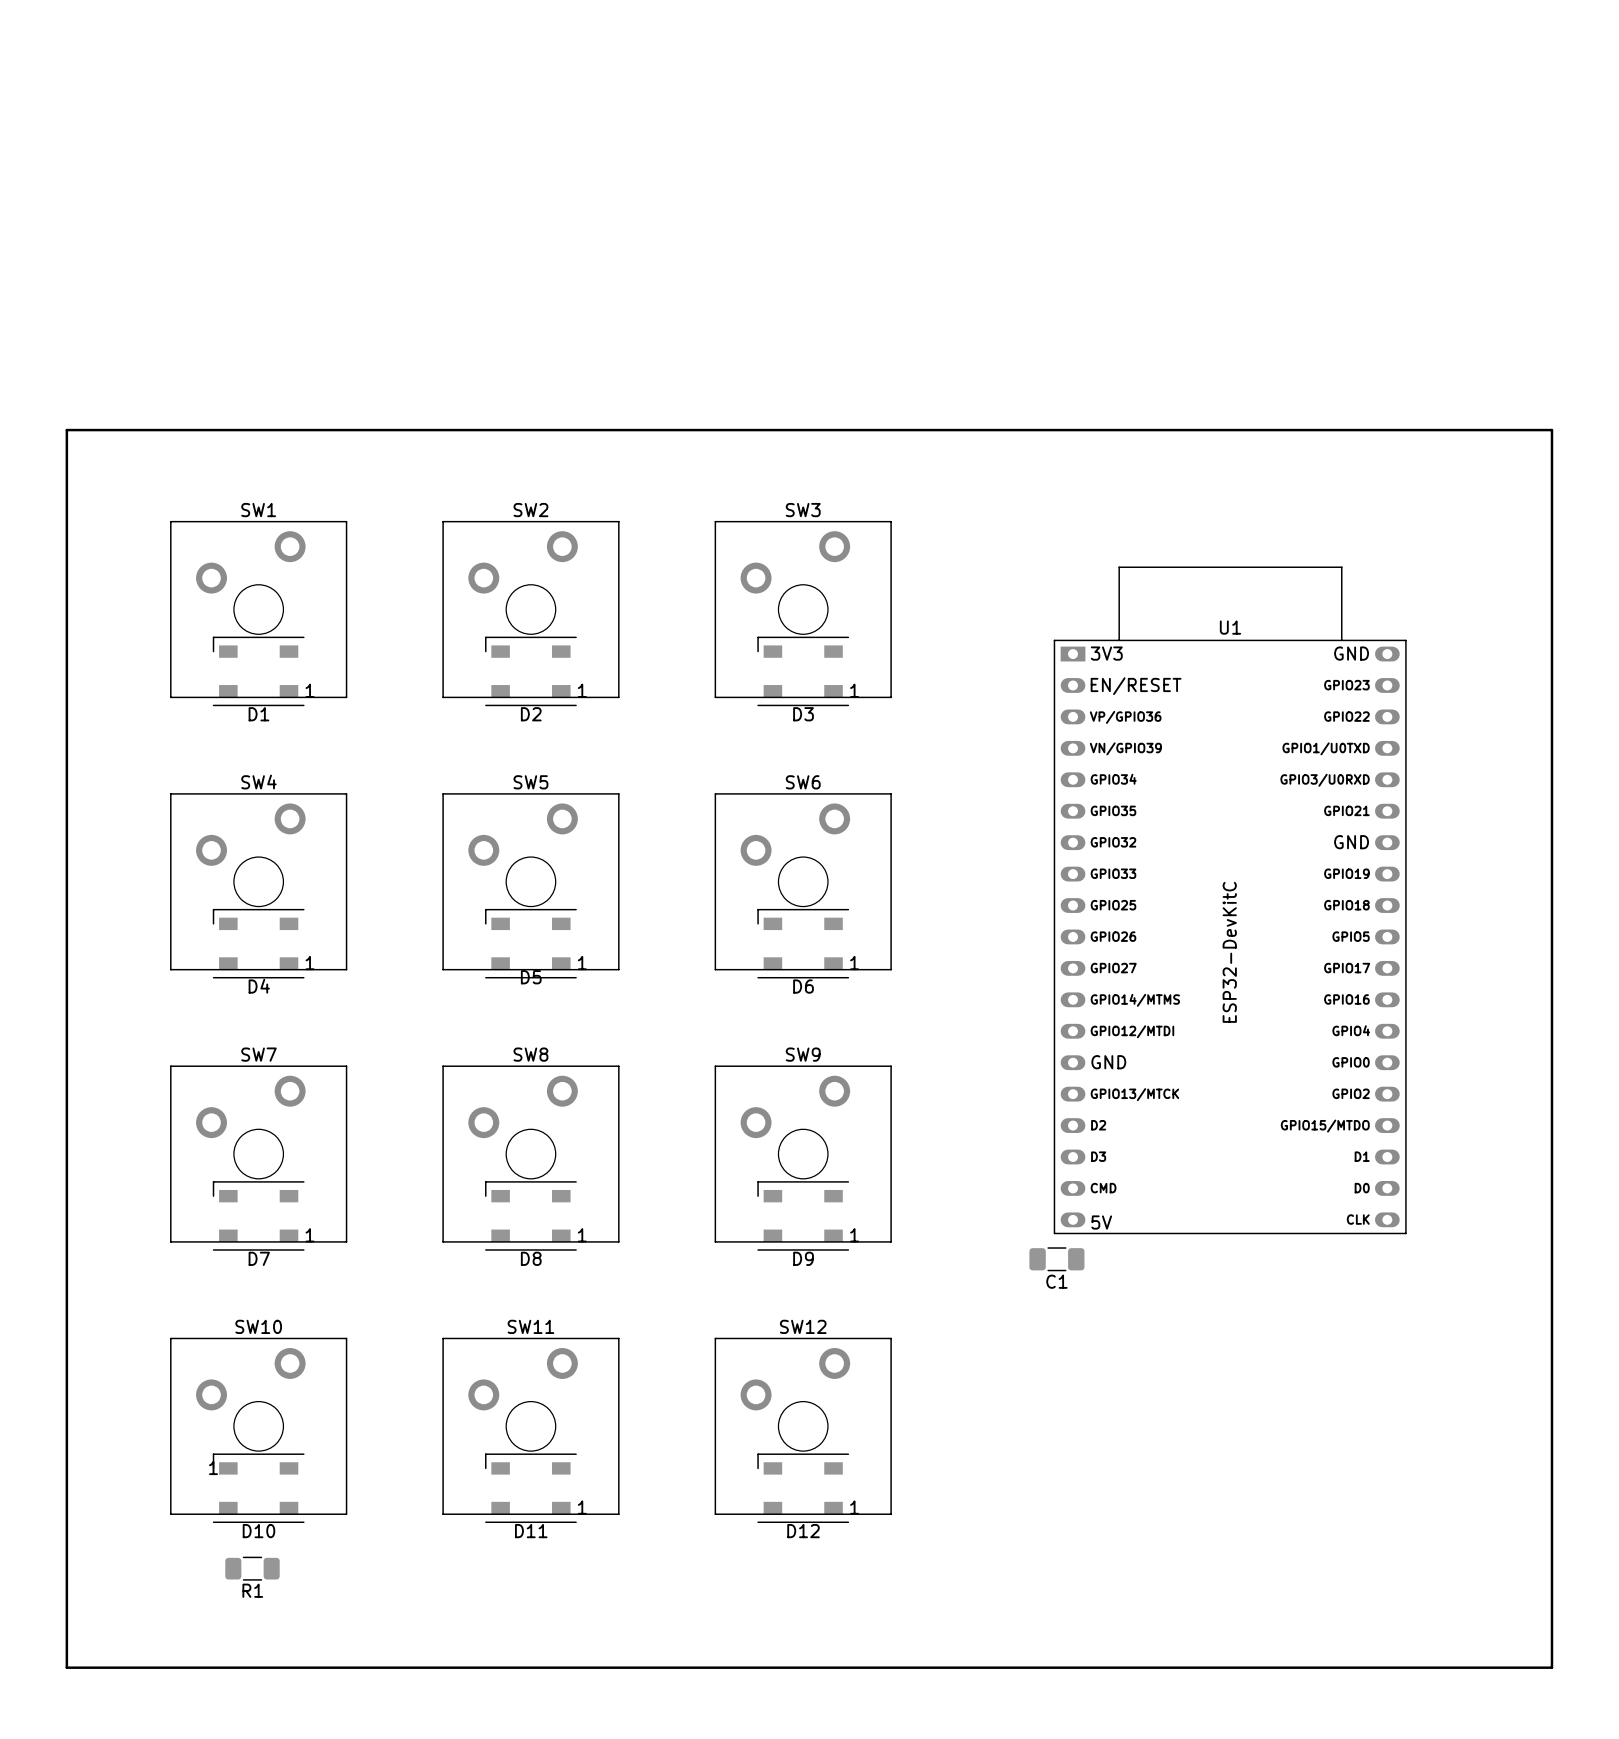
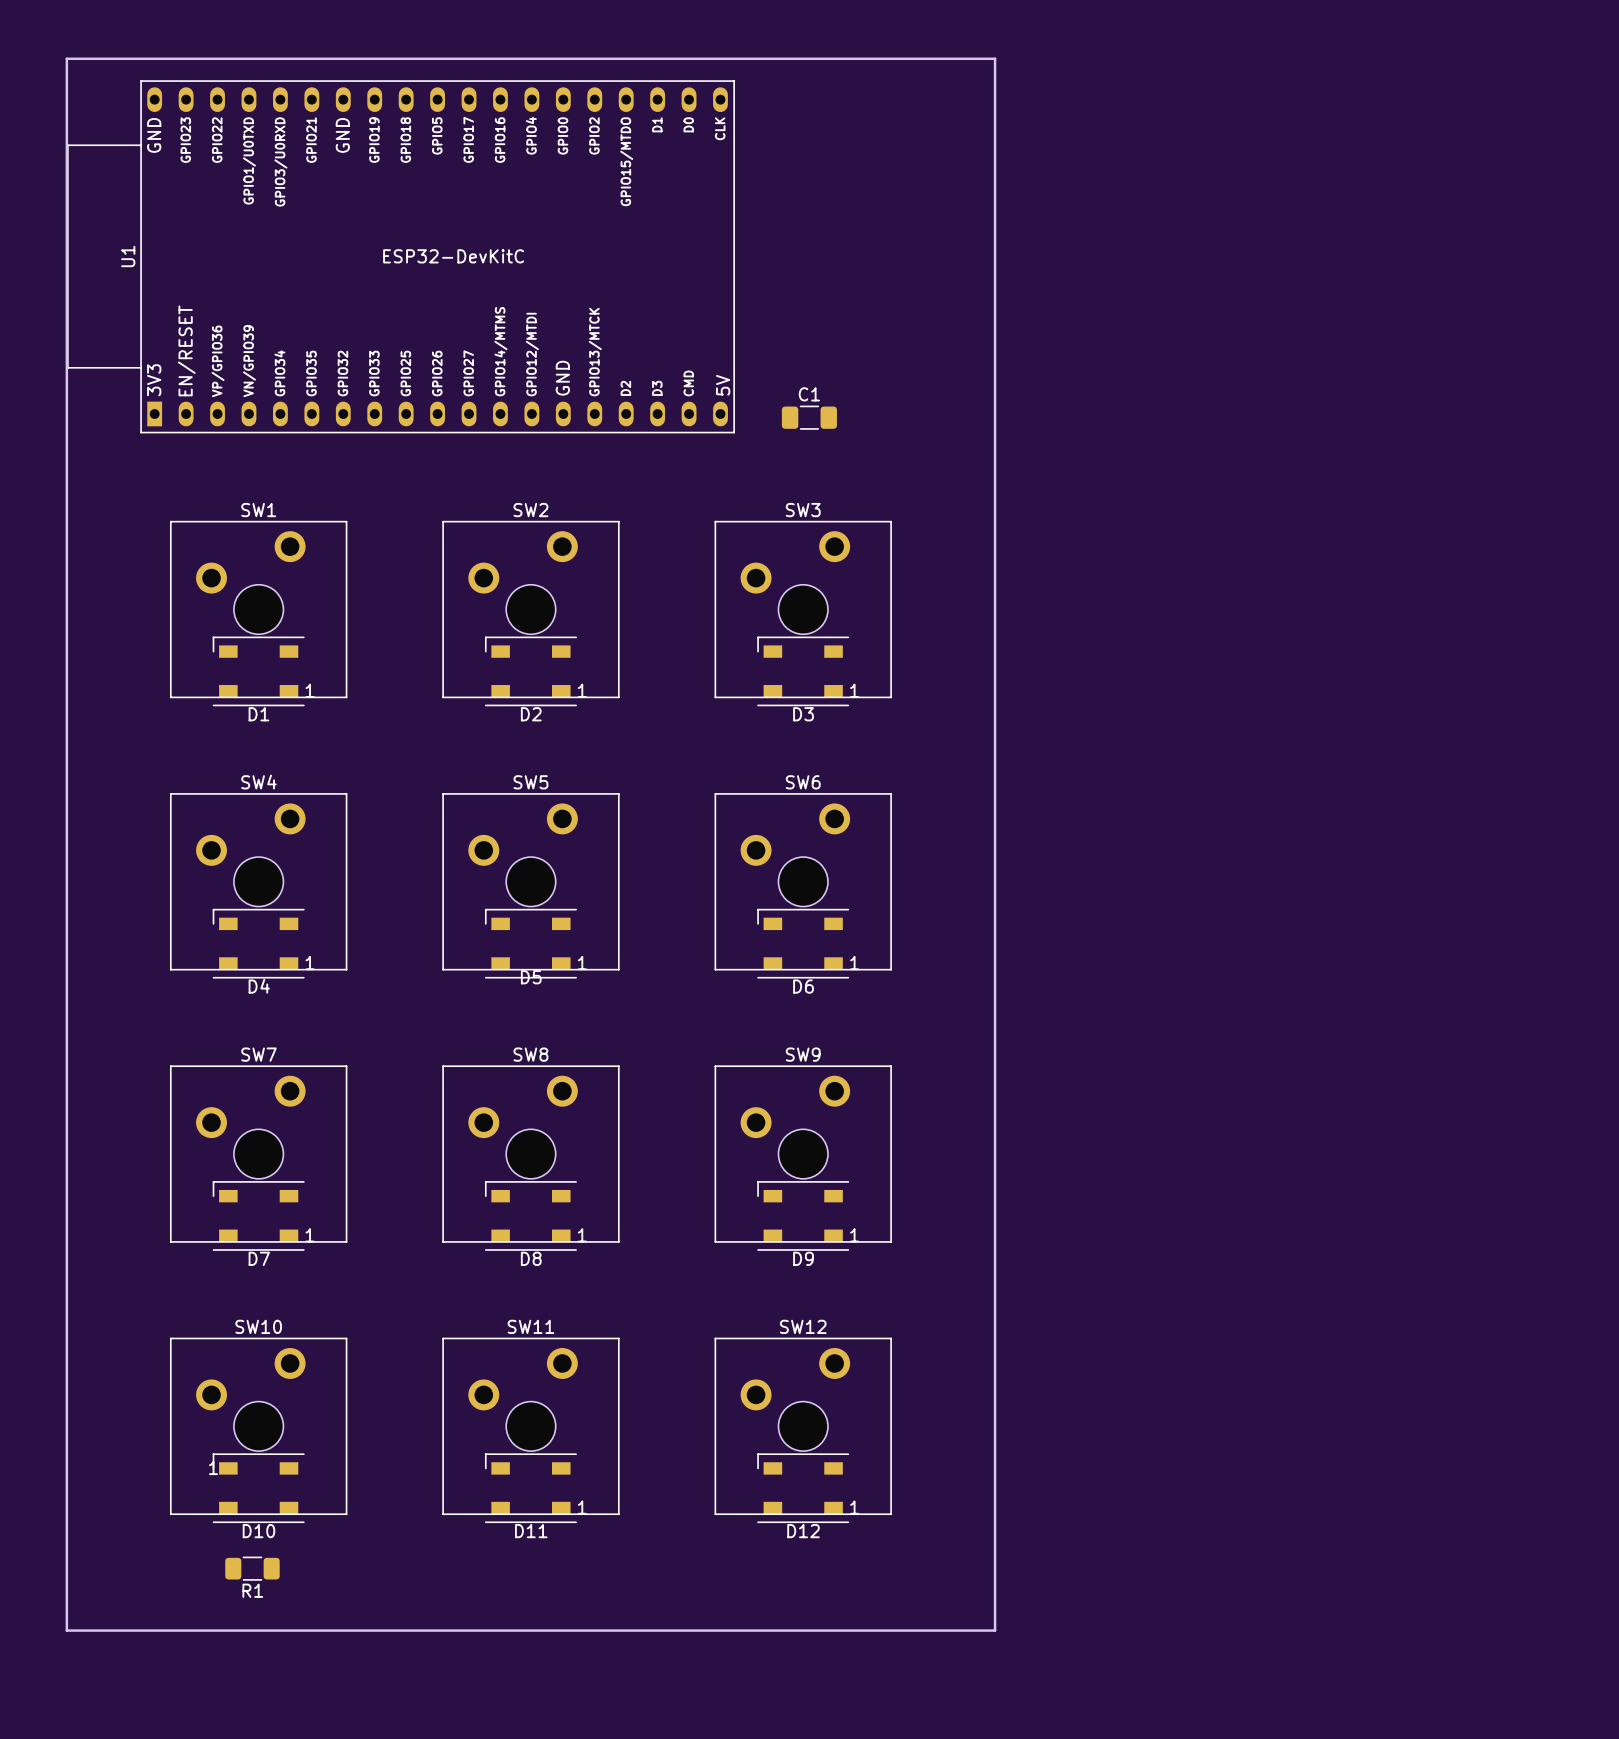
board edge: (66, 430) (1551, 430) (1551, 1667) (66, 1667) (66, 1630) -> (66, 430) (66, 58) (995, 58) (995, 1630) (66, 1630)
U1 rotation: 0° (1230, 900) -> 90° counterclockwise (401, 256)
U1 position: (1230, 900) -> (401, 256)
C1 position: (1056, 1259) -> (809, 417)
C1 name position: C1 (1056, 1281) -> C1 (809, 394)

